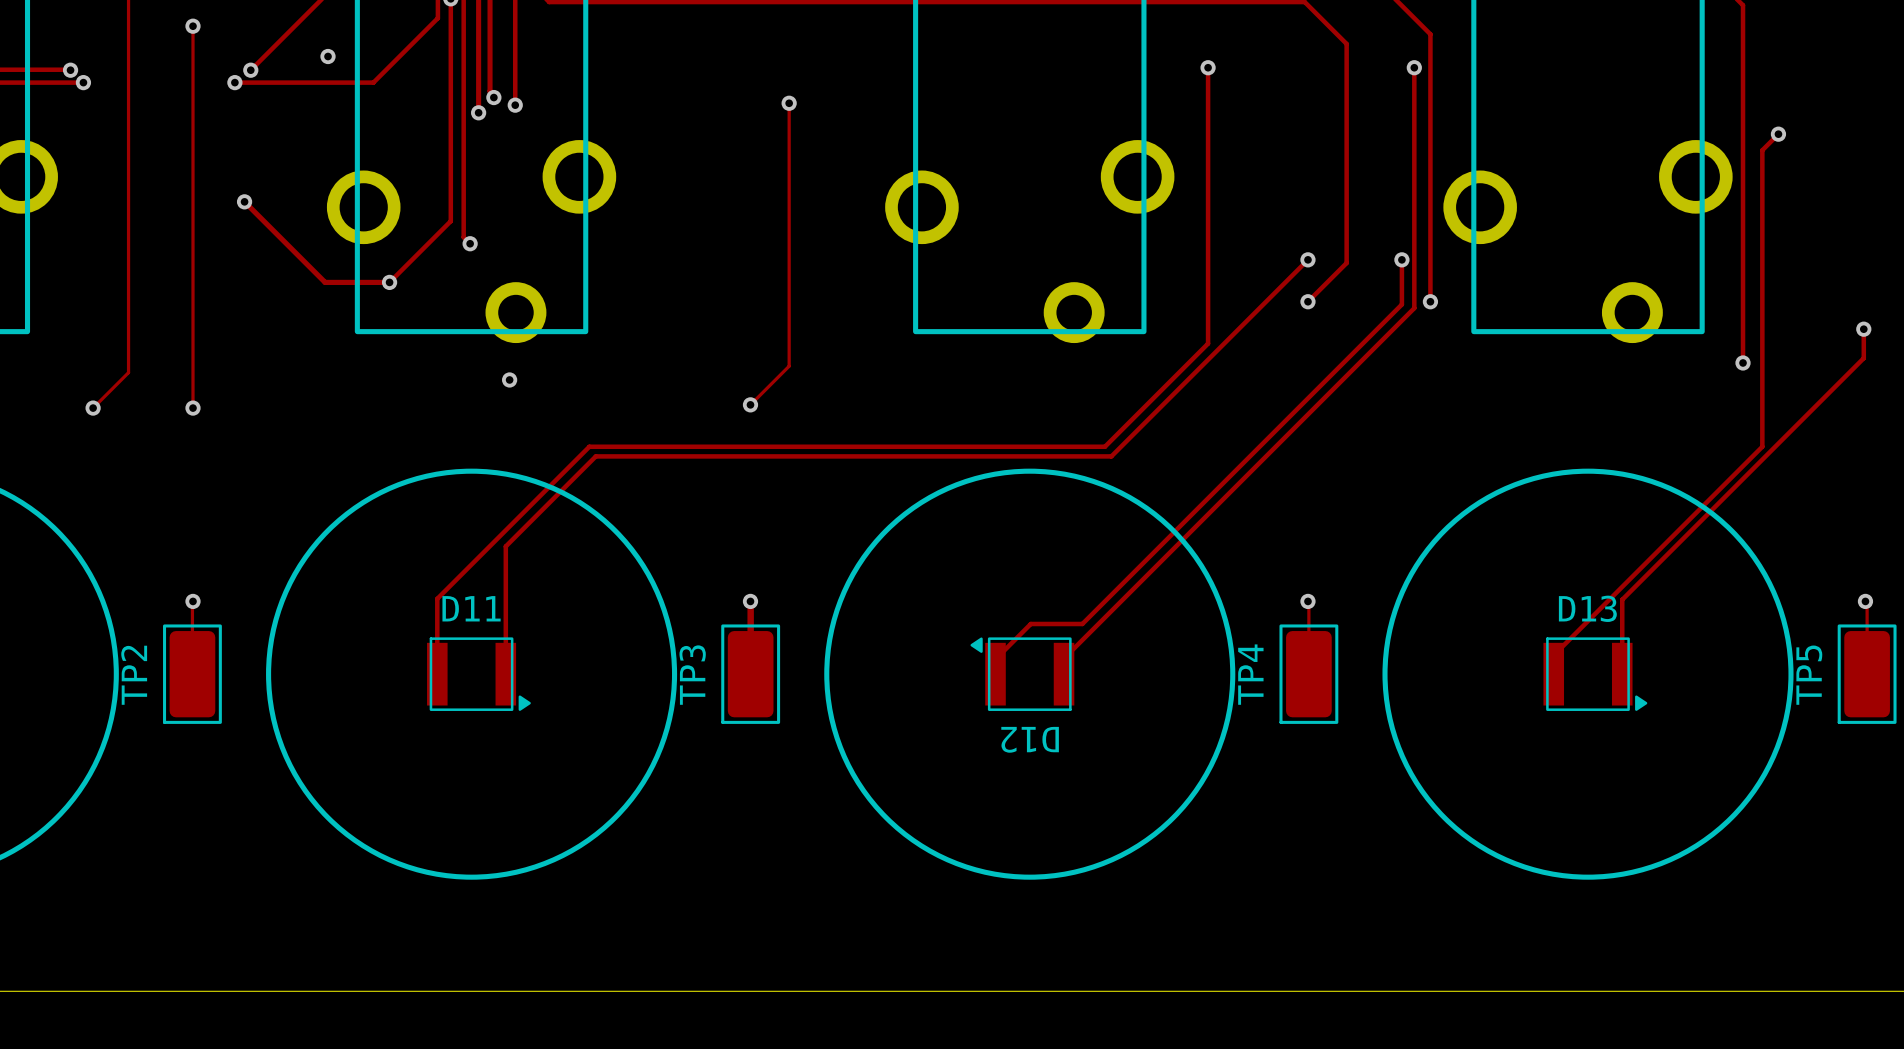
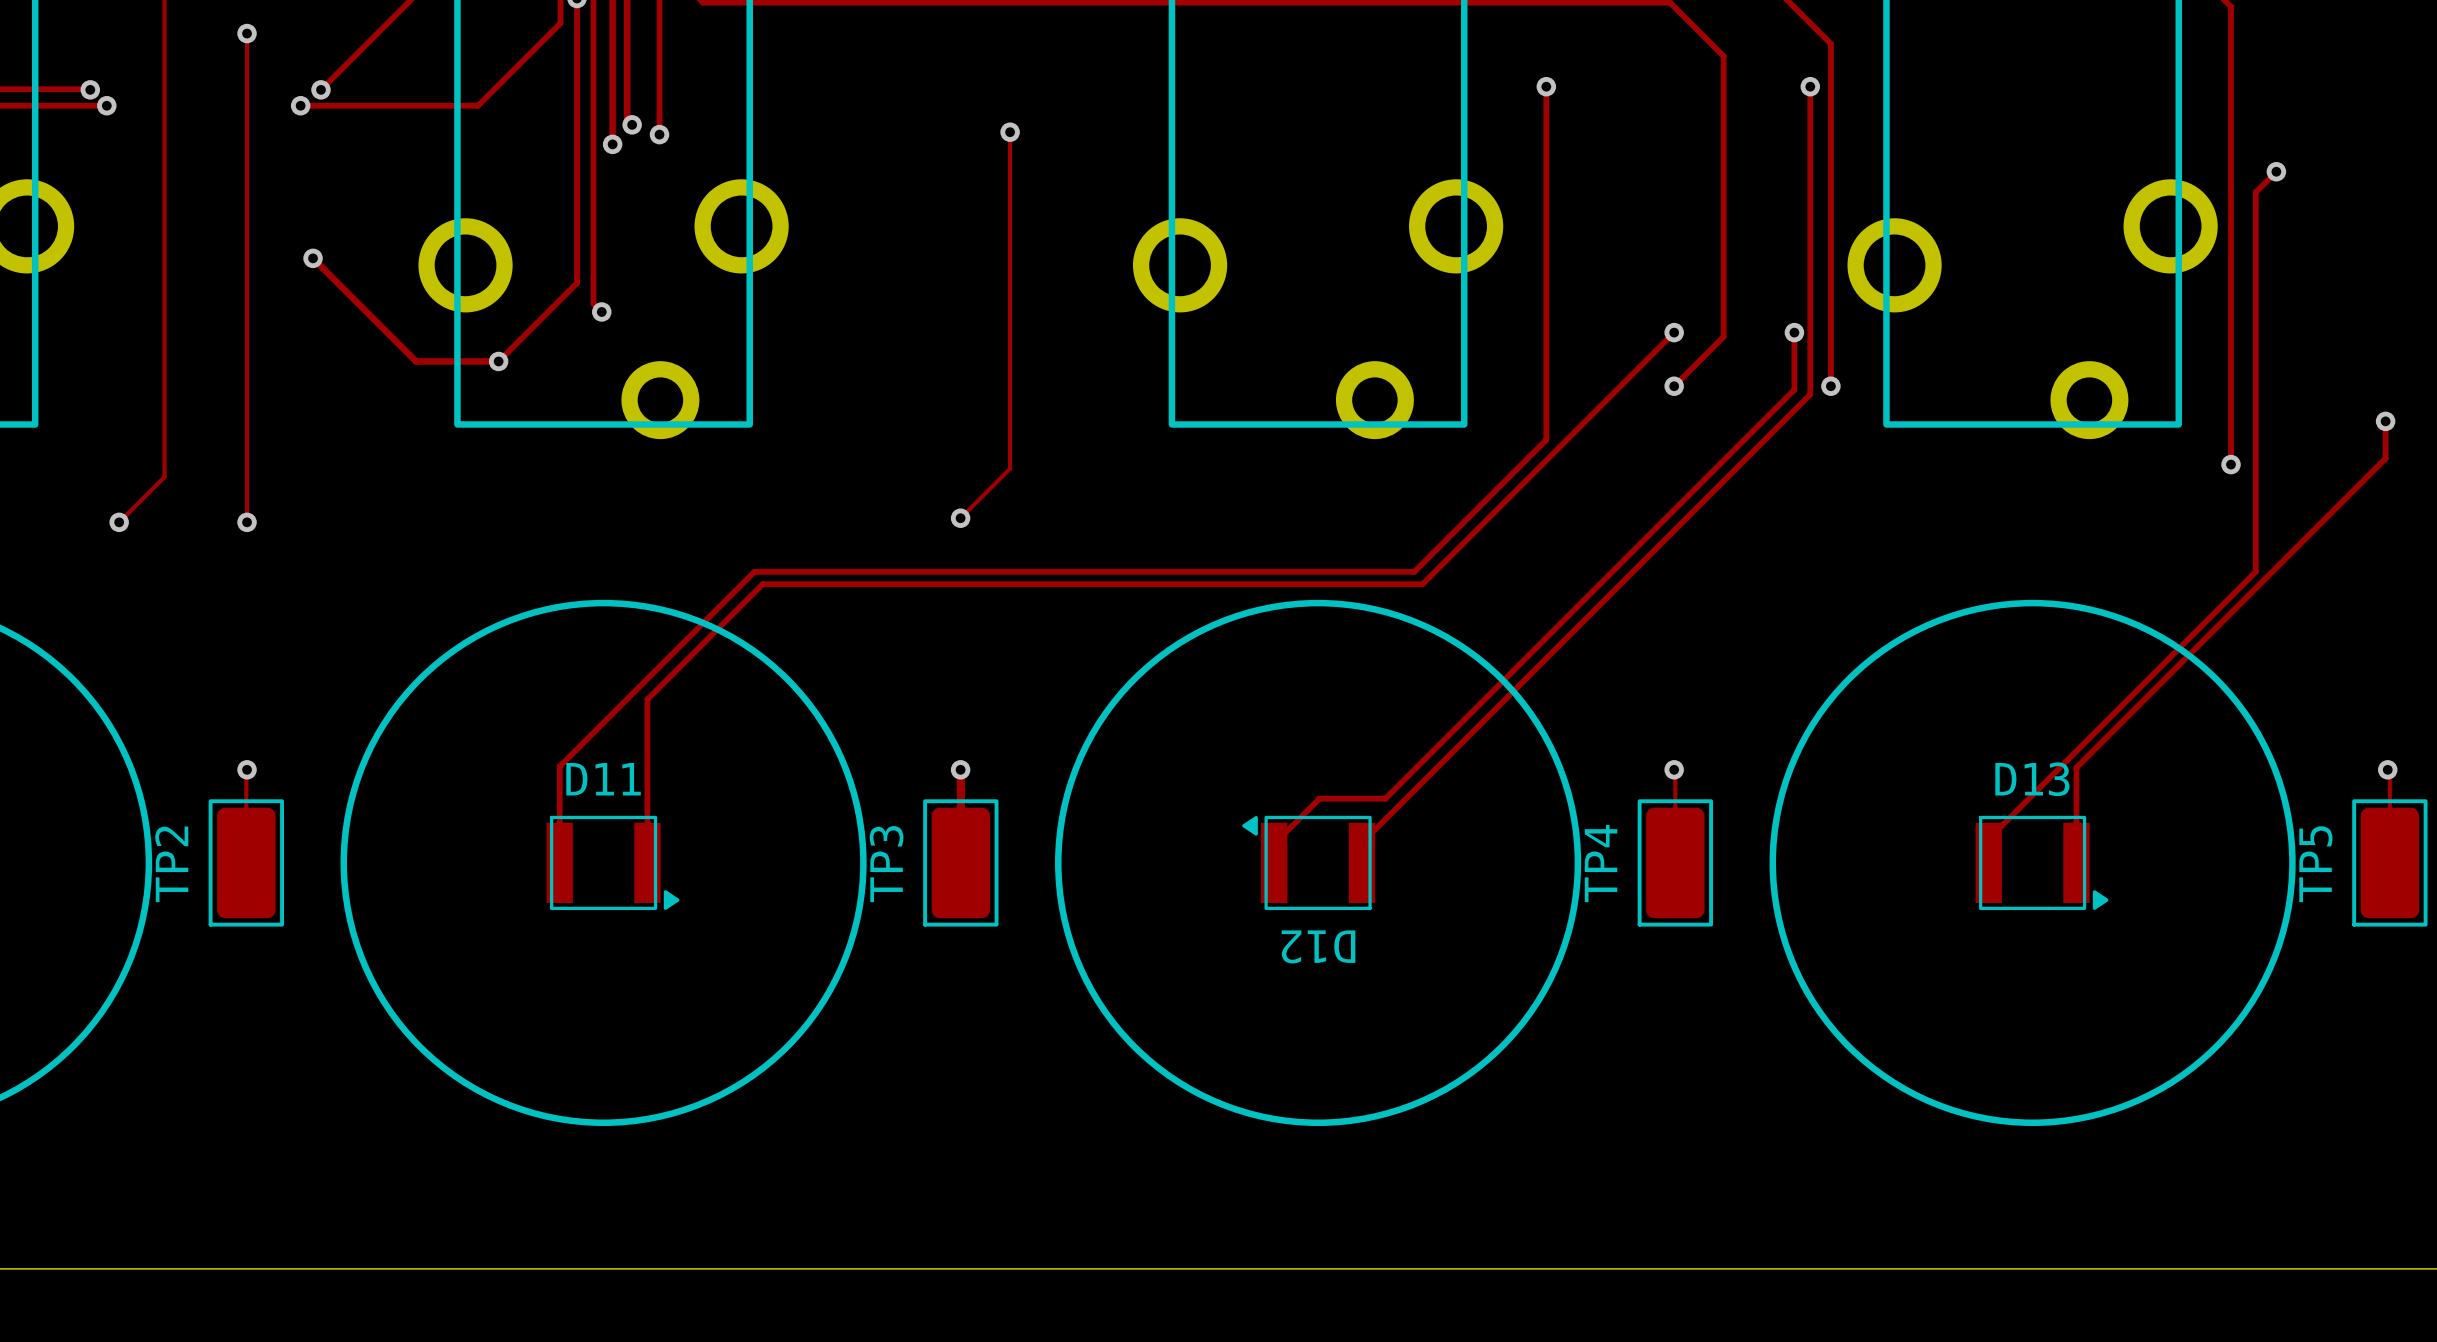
via: (328, 56) -> none
via: (509, 379) -> none

